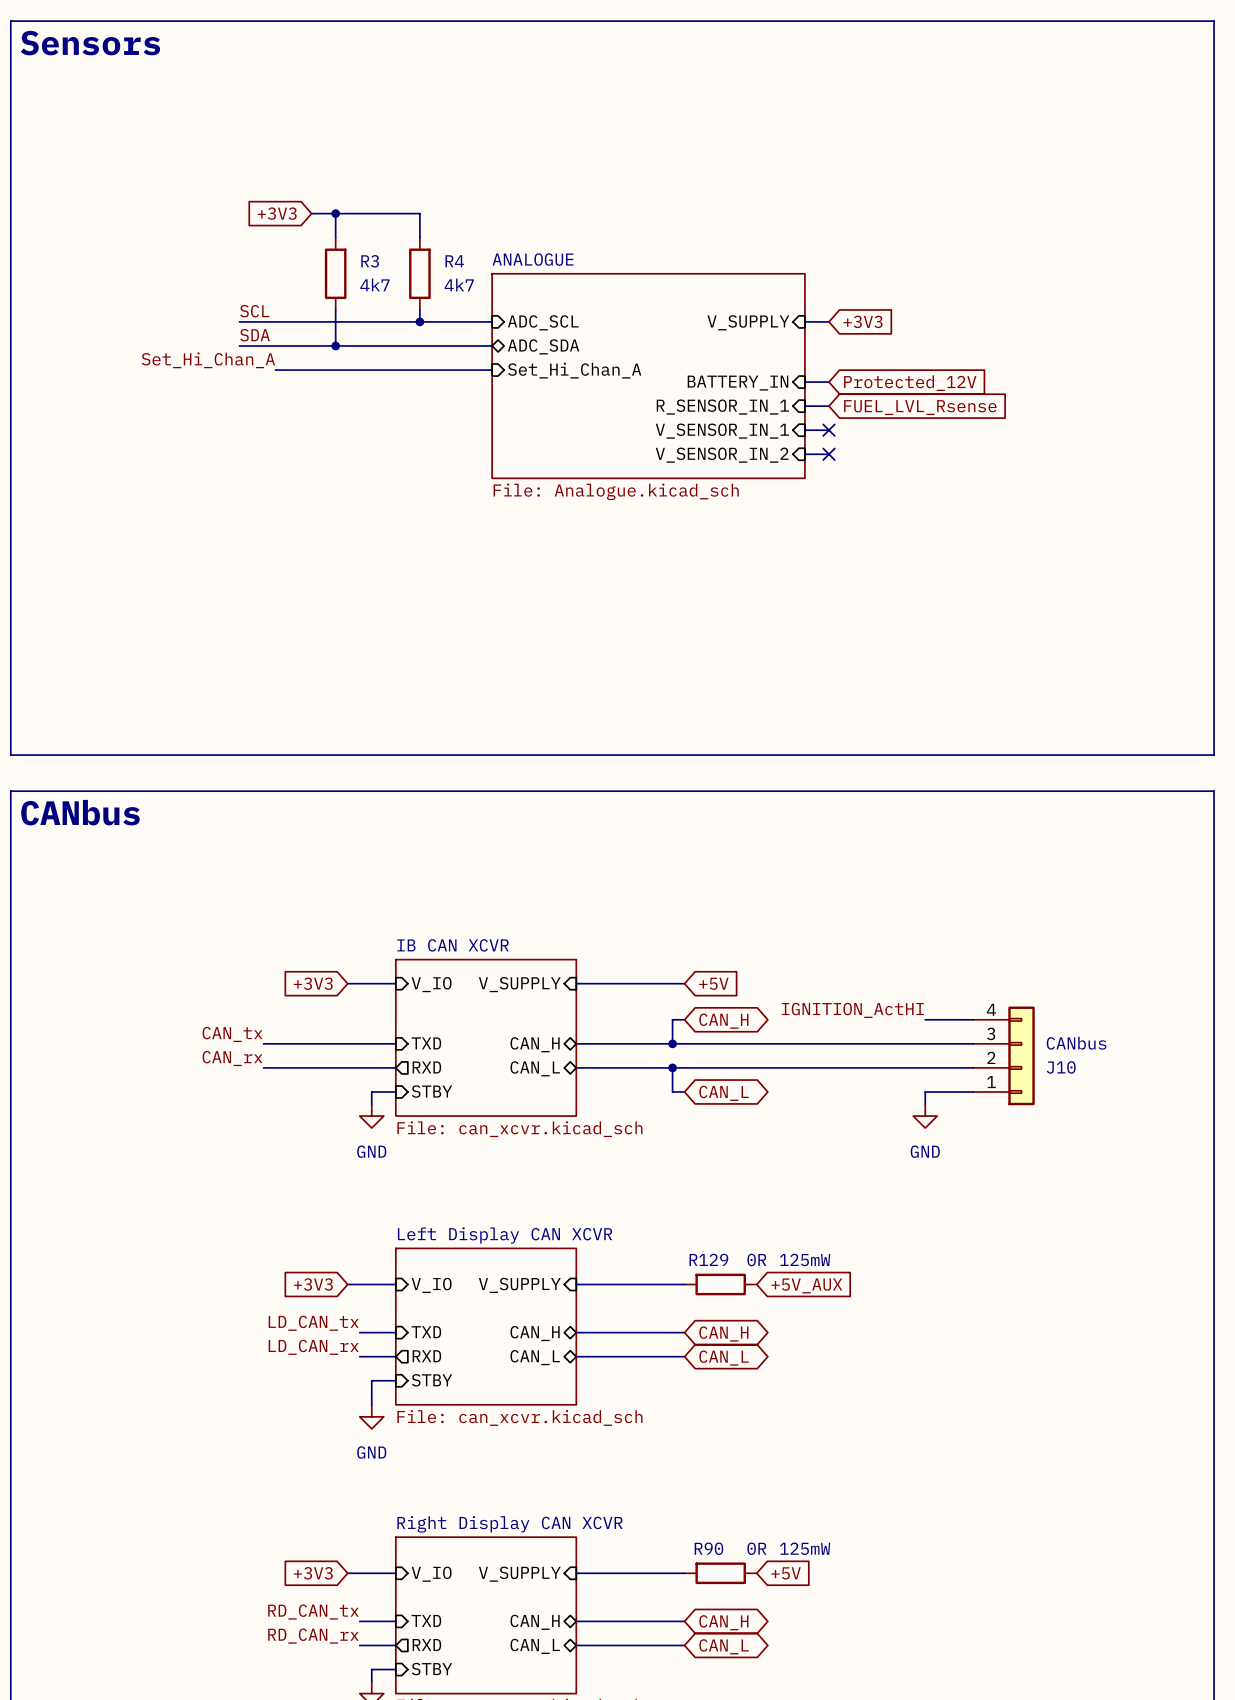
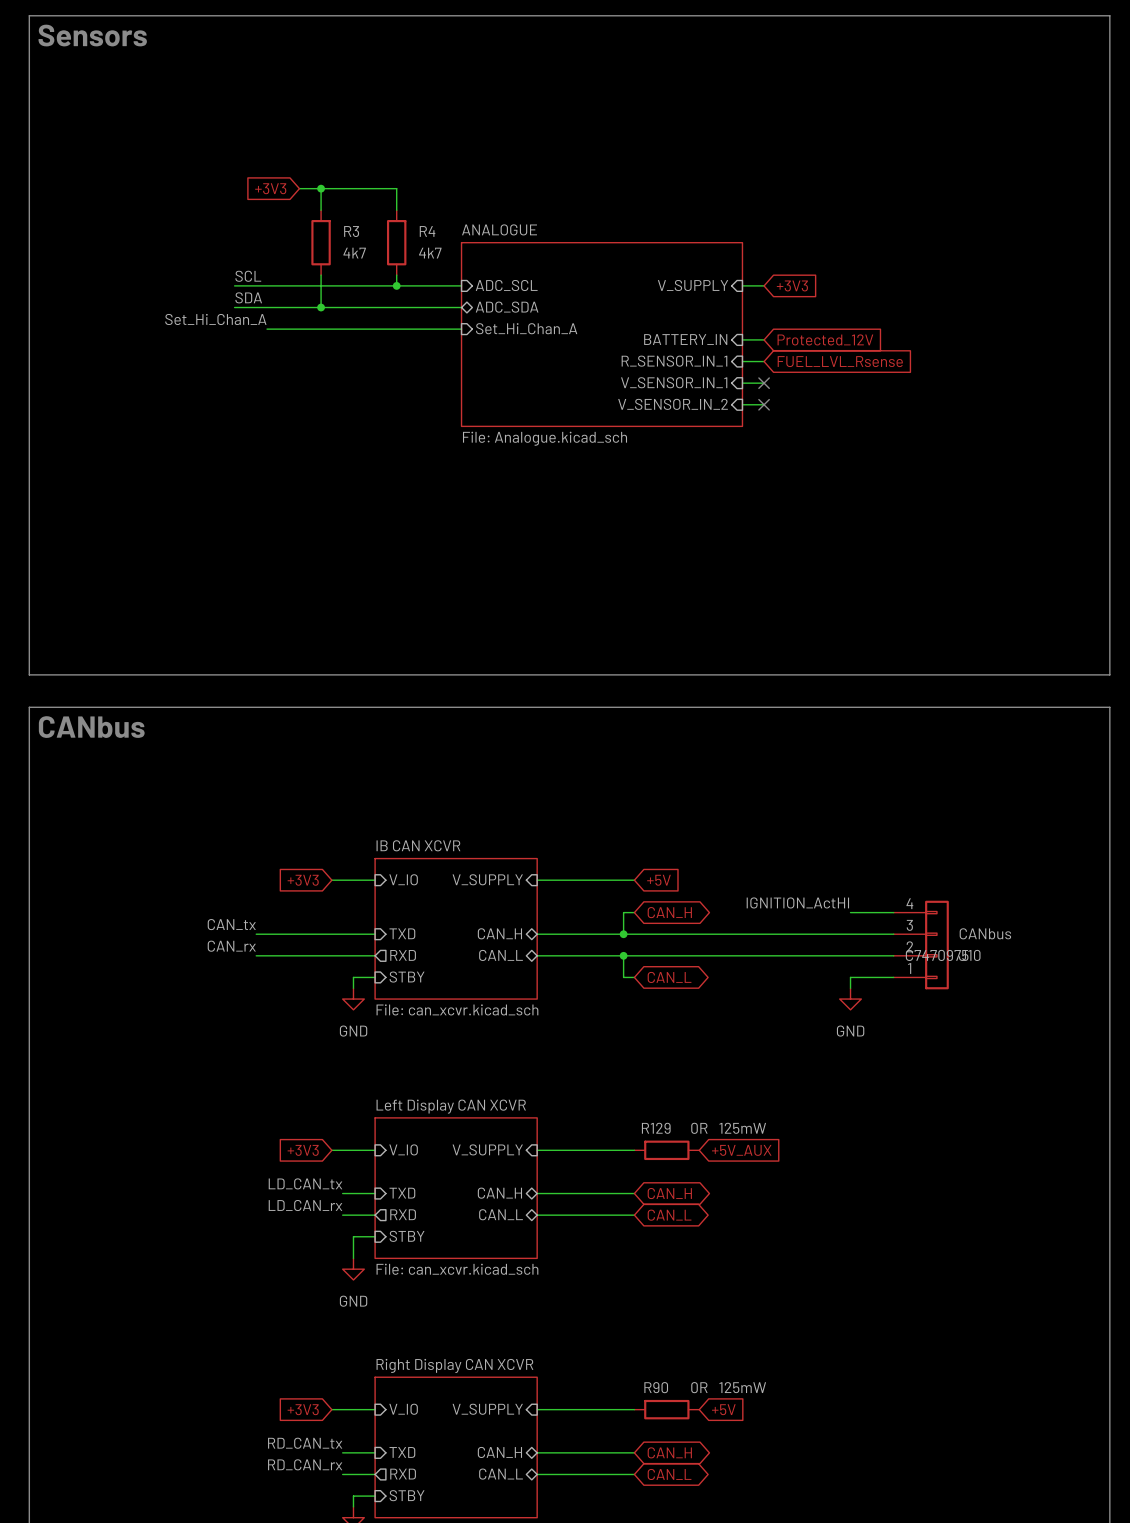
J10 text: none -> C7470975 (937, 955)

